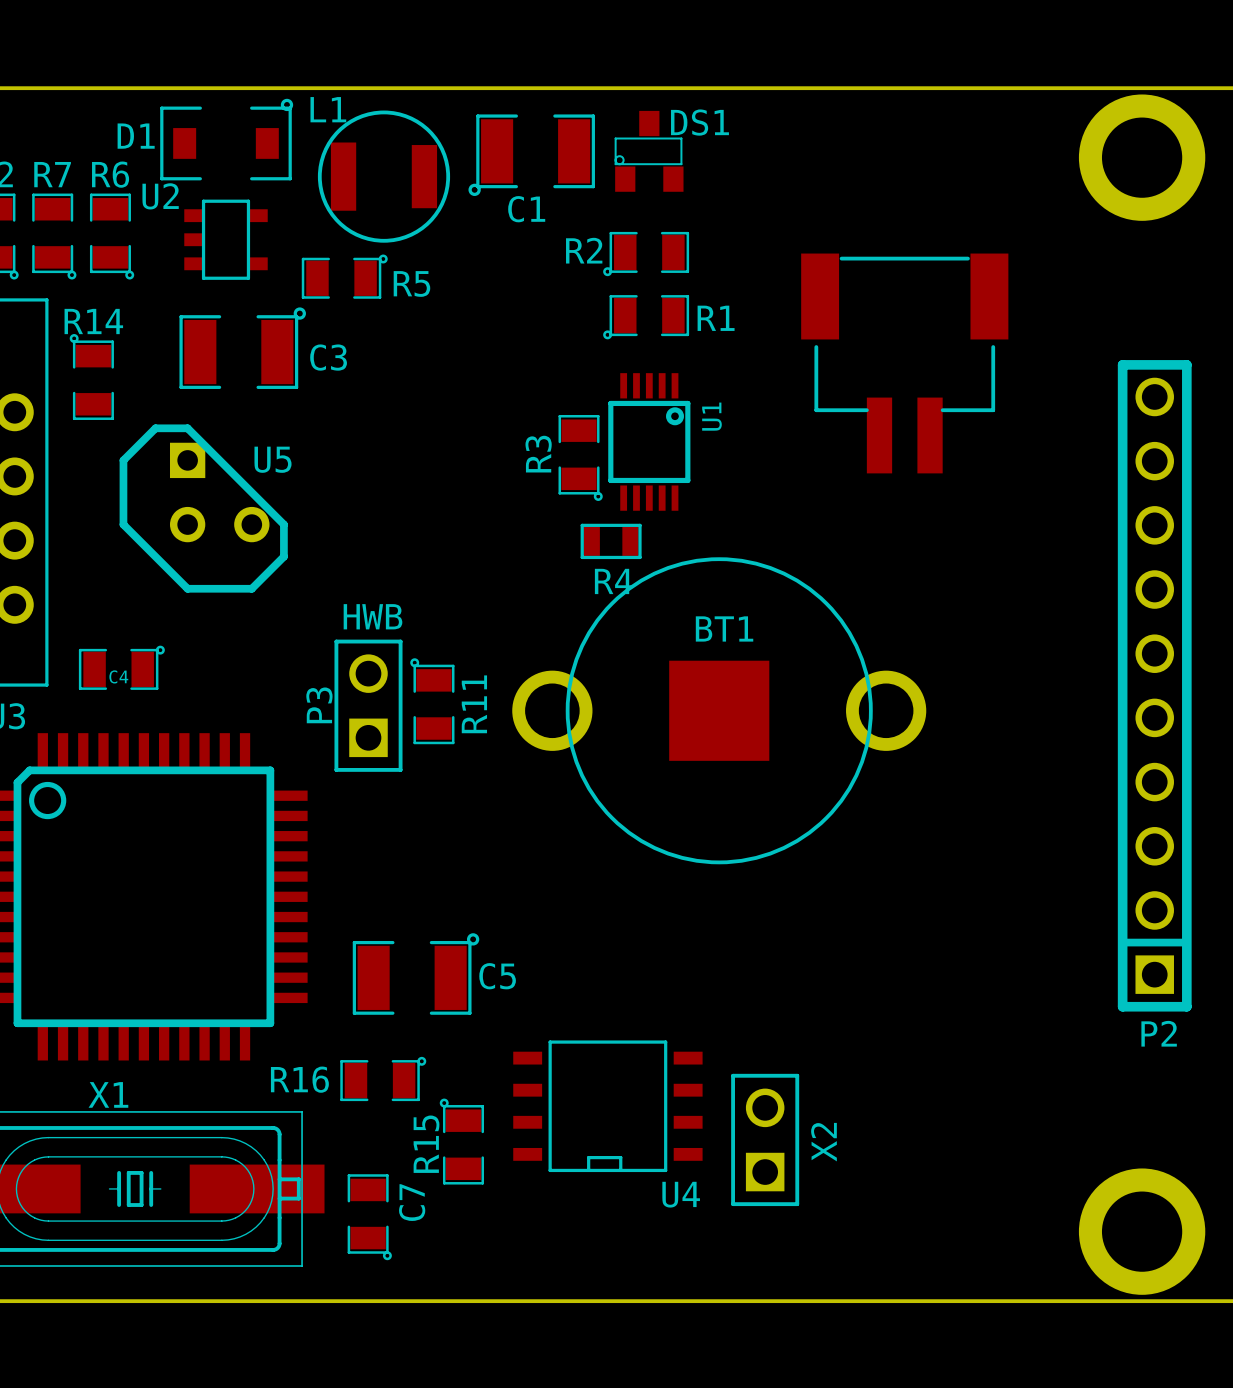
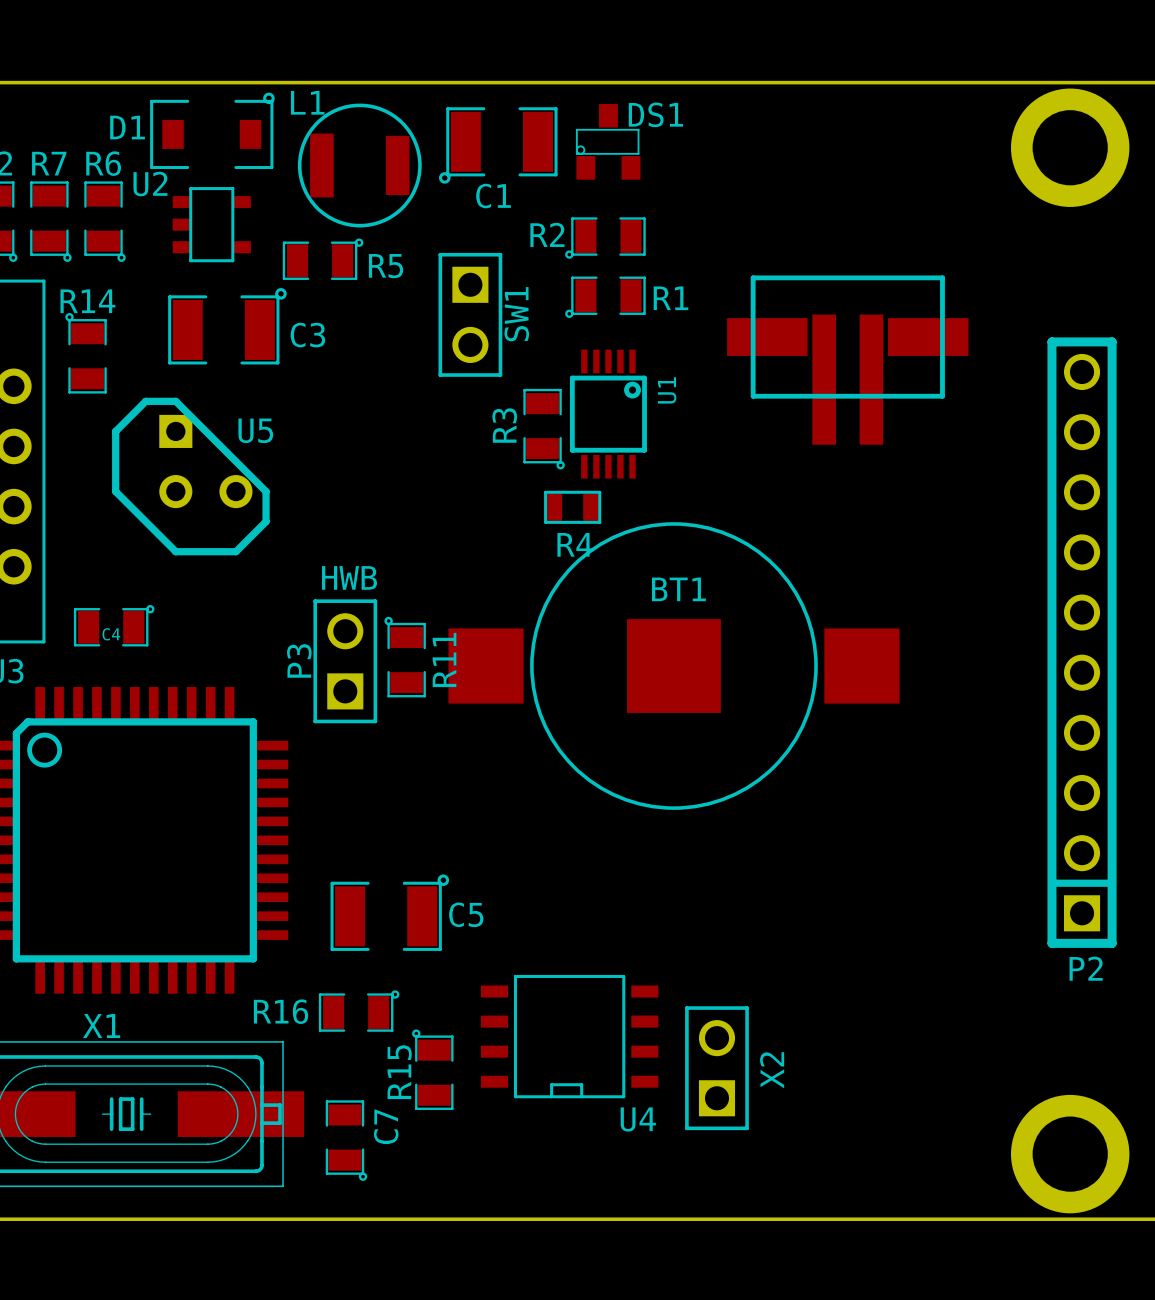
part footprint: [801, 253, 1009, 474] -> [727, 275, 969, 445]
SW1: none -> (470, 314)
BT1 footprint: [512, 557, 927, 865] -> [448, 522, 900, 810]

